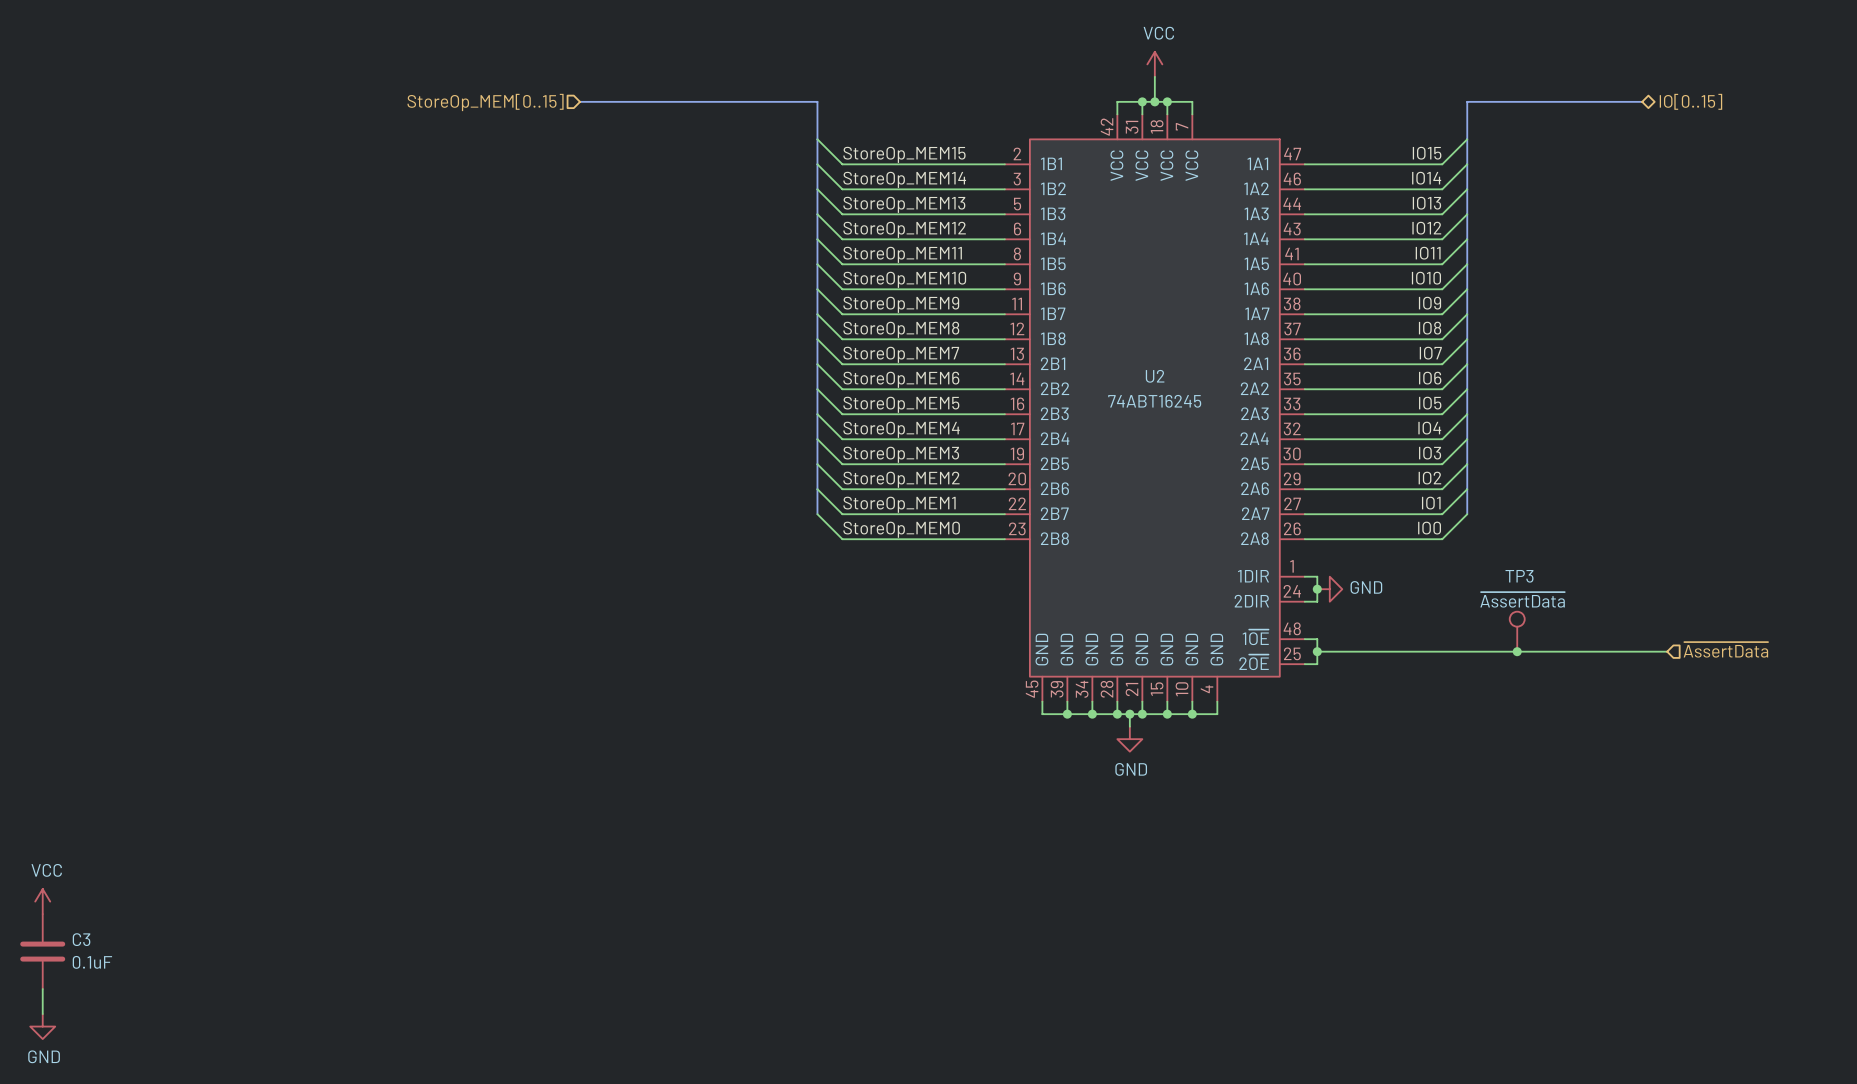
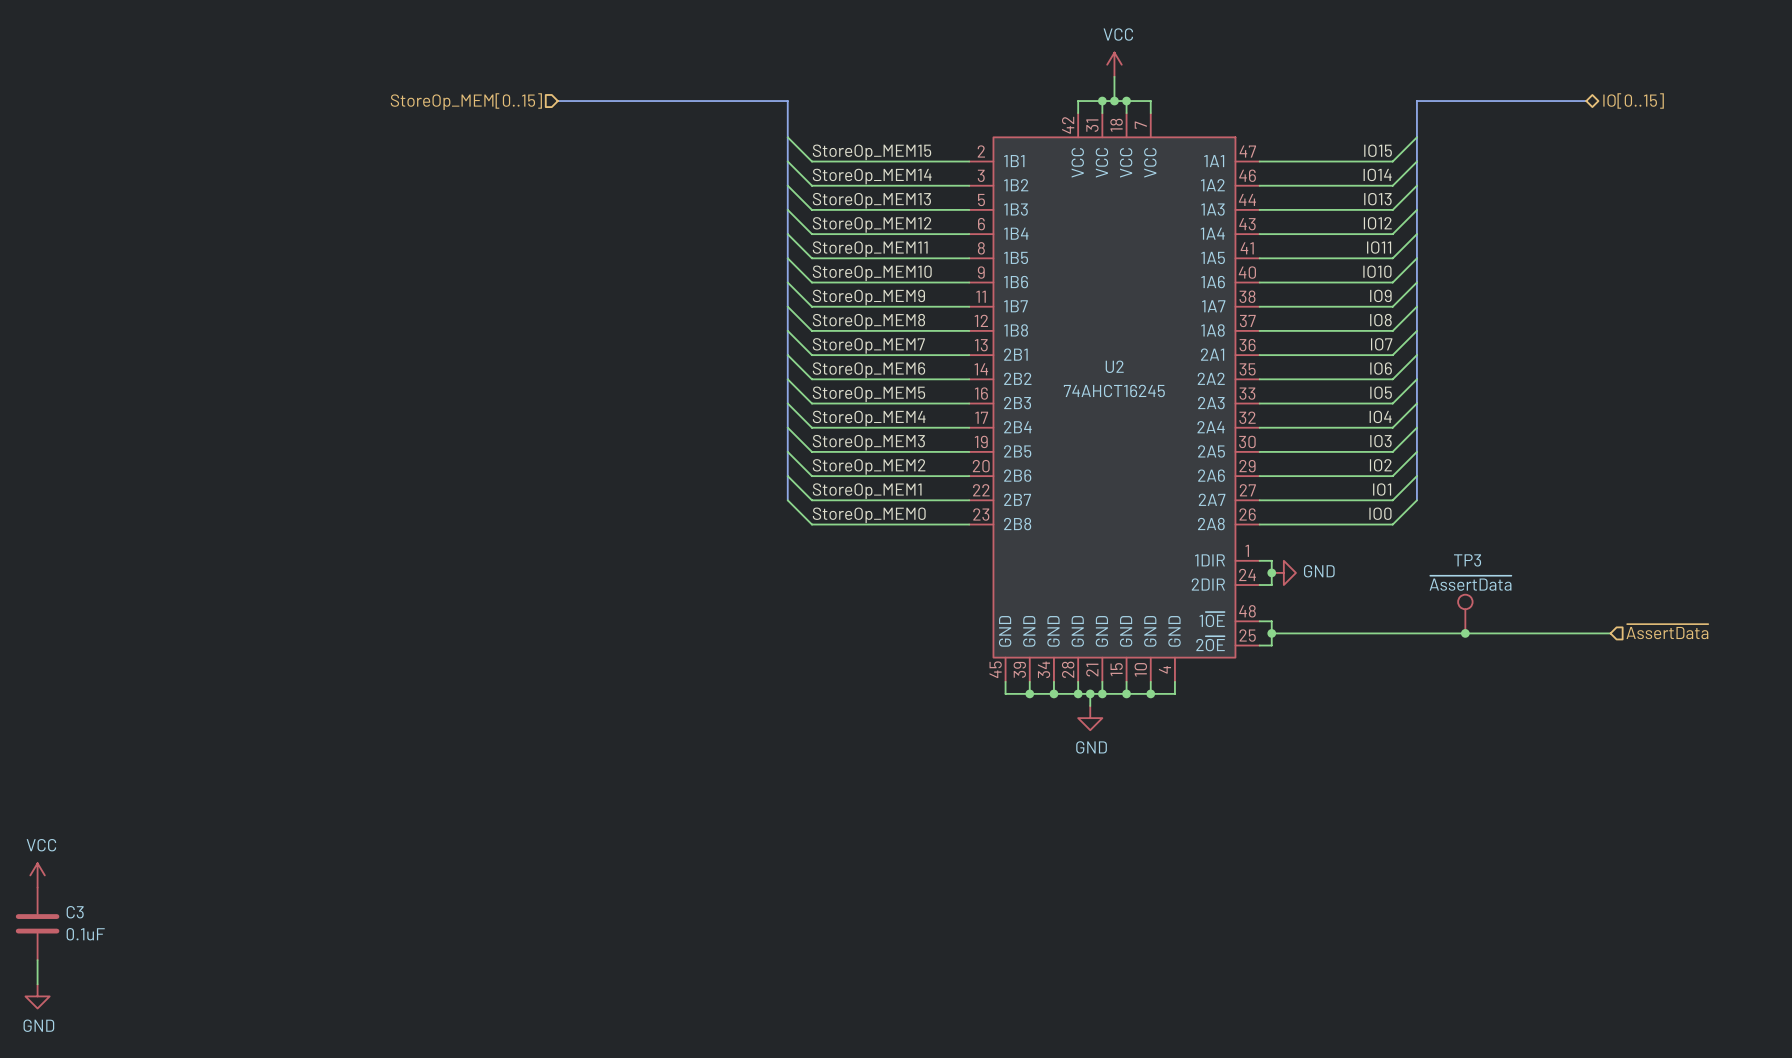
U2 value: 74ABT16245 (1154, 401) -> 74AHCT16245 (1114, 390)

